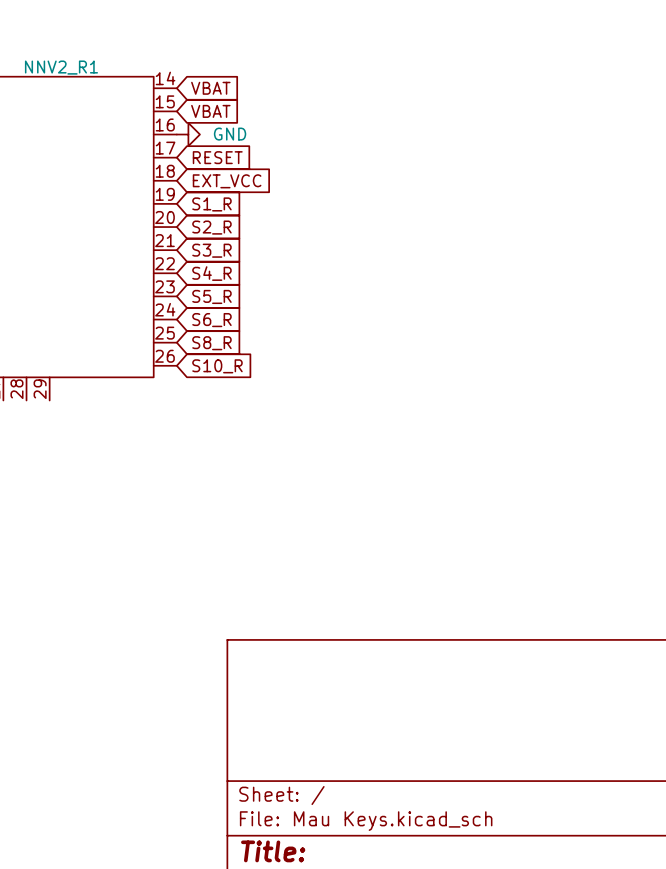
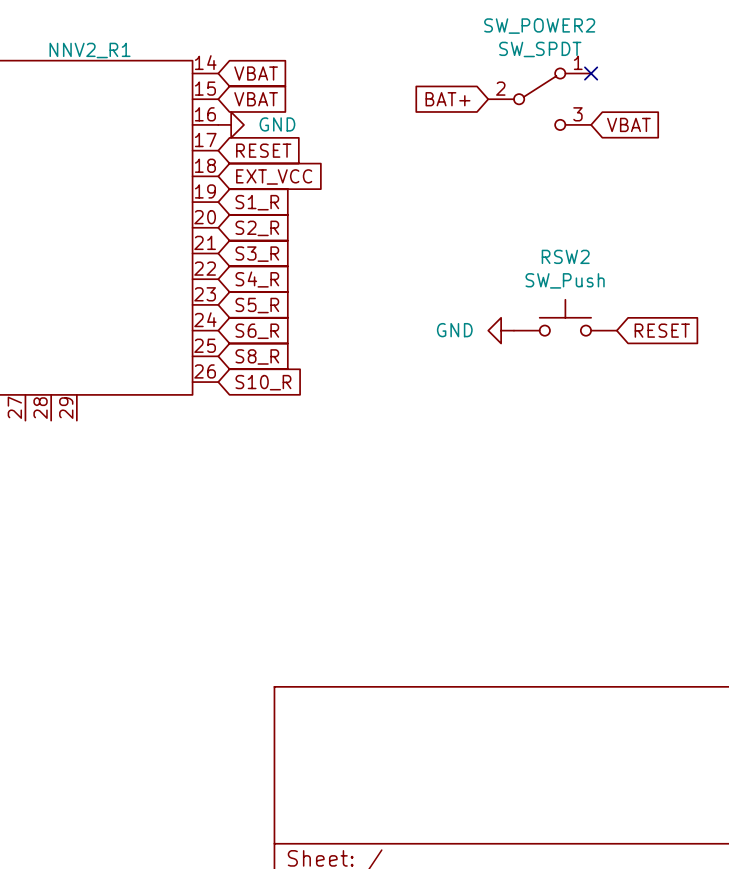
no-connect mark: none -> (591, 73)
global label: none -> BAT+ (447, 99)
SW_POWER2: none -> SW_SPDT (539, 99)
global label: none -> VBAT (628, 124)
RSW2: none -> SW_Push (565, 317)
power symbol: none -> GND (501, 330)
global label: none -> RESET (662, 330)

